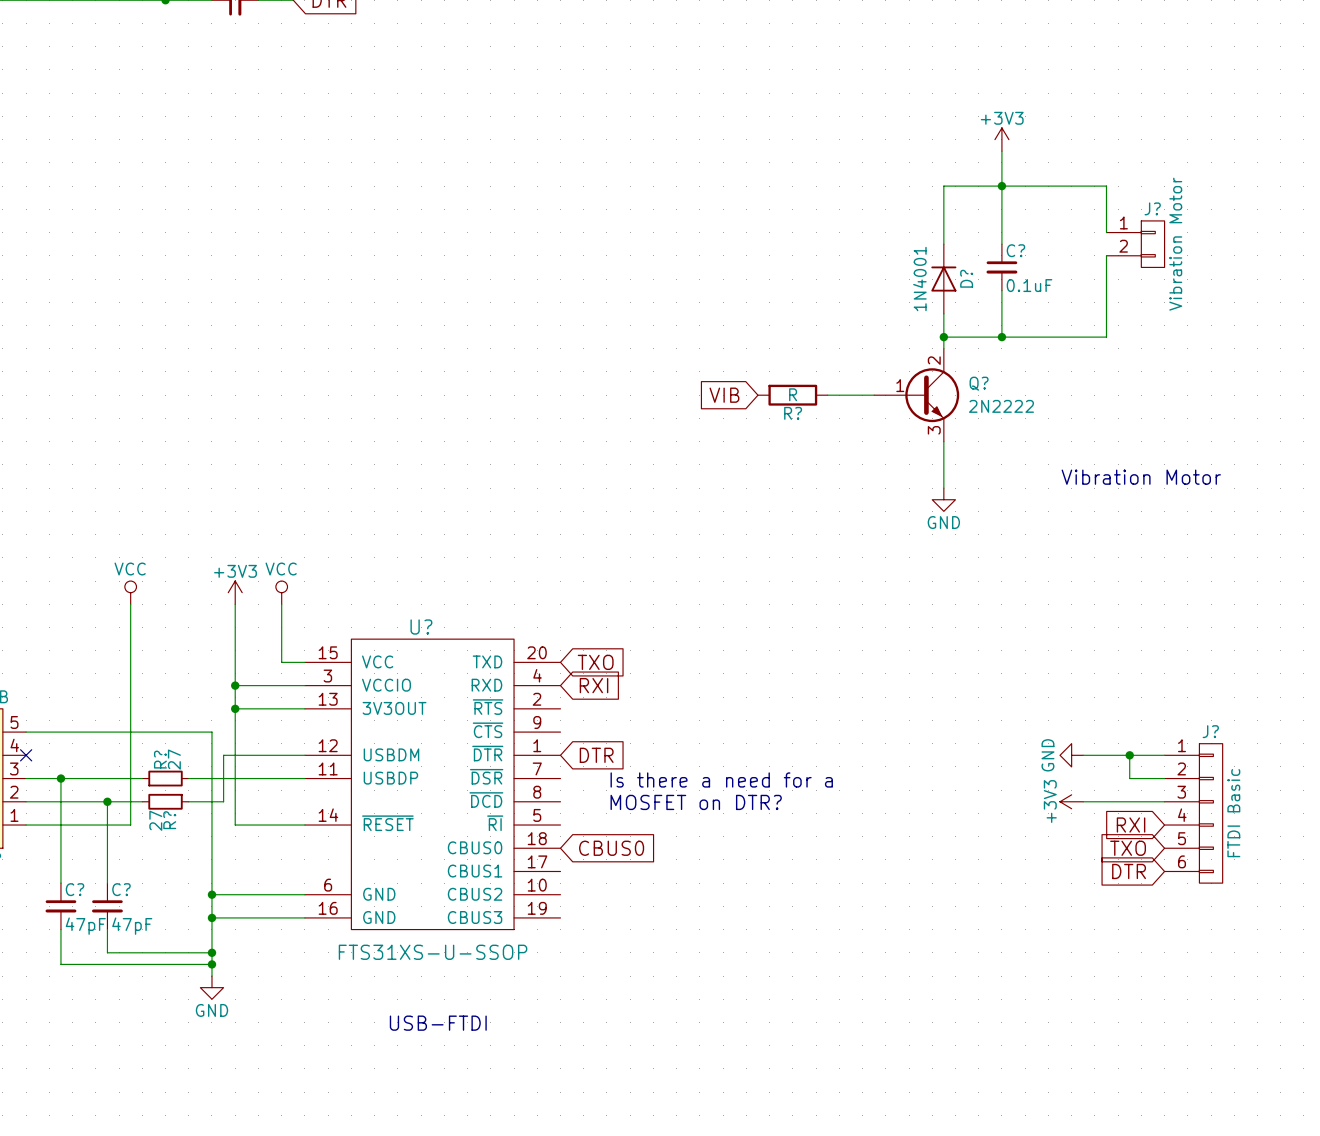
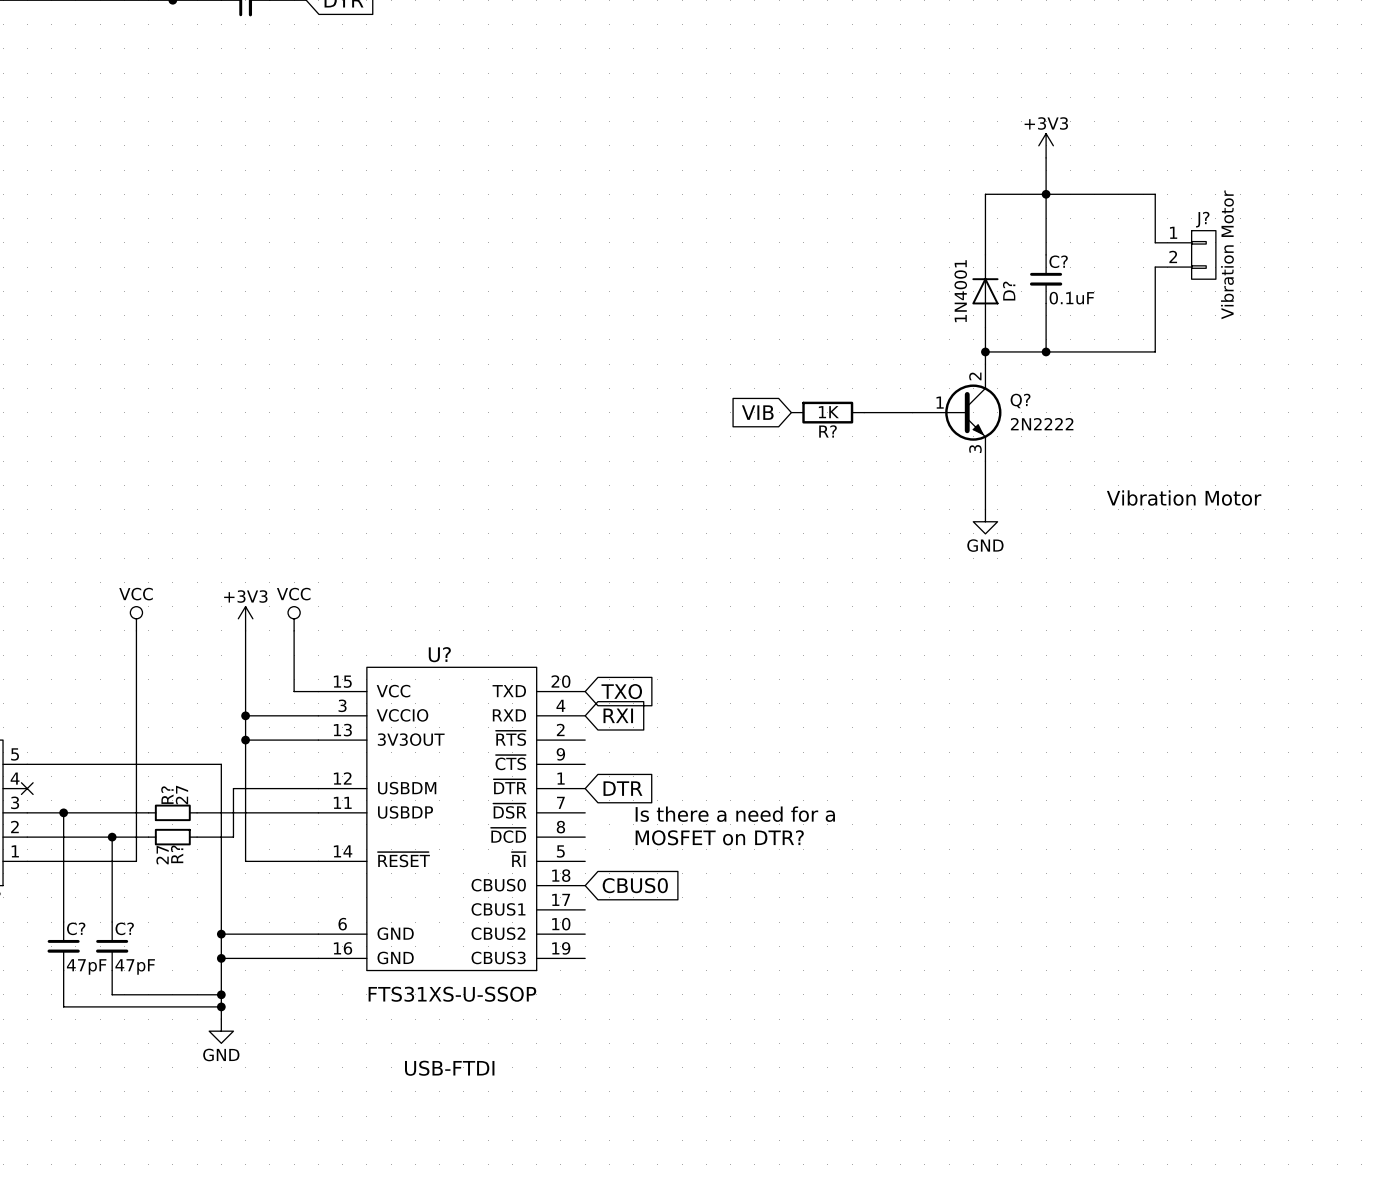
R? value: R (793, 394) -> 1K (828, 412)
power symbol: GND (1071, 755) -> none
wire: (1083, 755) (1164, 755) -> none
wire: (1129, 755) (1129, 778) (1164, 778) -> none
junction: (1129, 755) -> none
power symbol: +3V3 (1071, 801) -> none
wire: (1083, 801) (1164, 801) -> none
J?: FTDI Basic (1193, 813) -> none
global label: RXI (1131, 825) -> none
global label: TXO (1128, 848) -> none
global label: DTR (1129, 871) -> none

